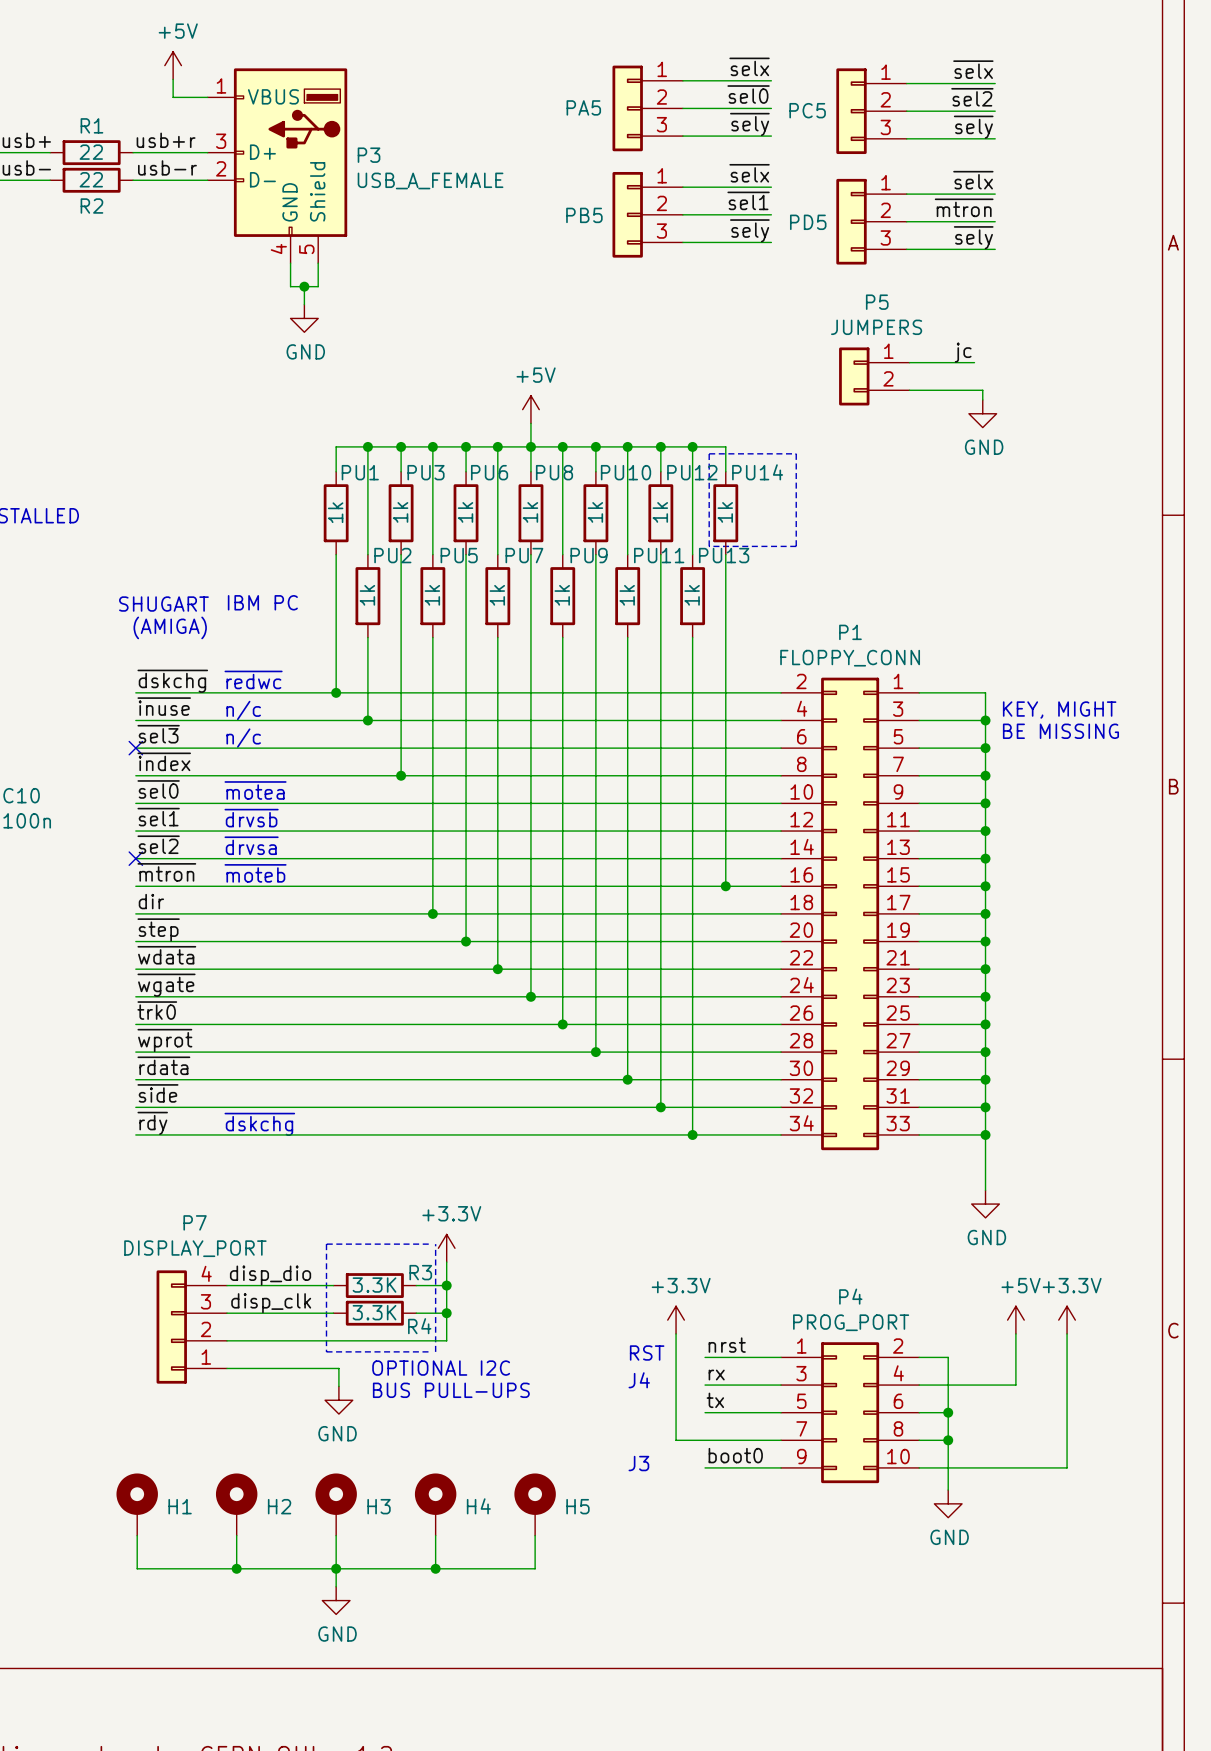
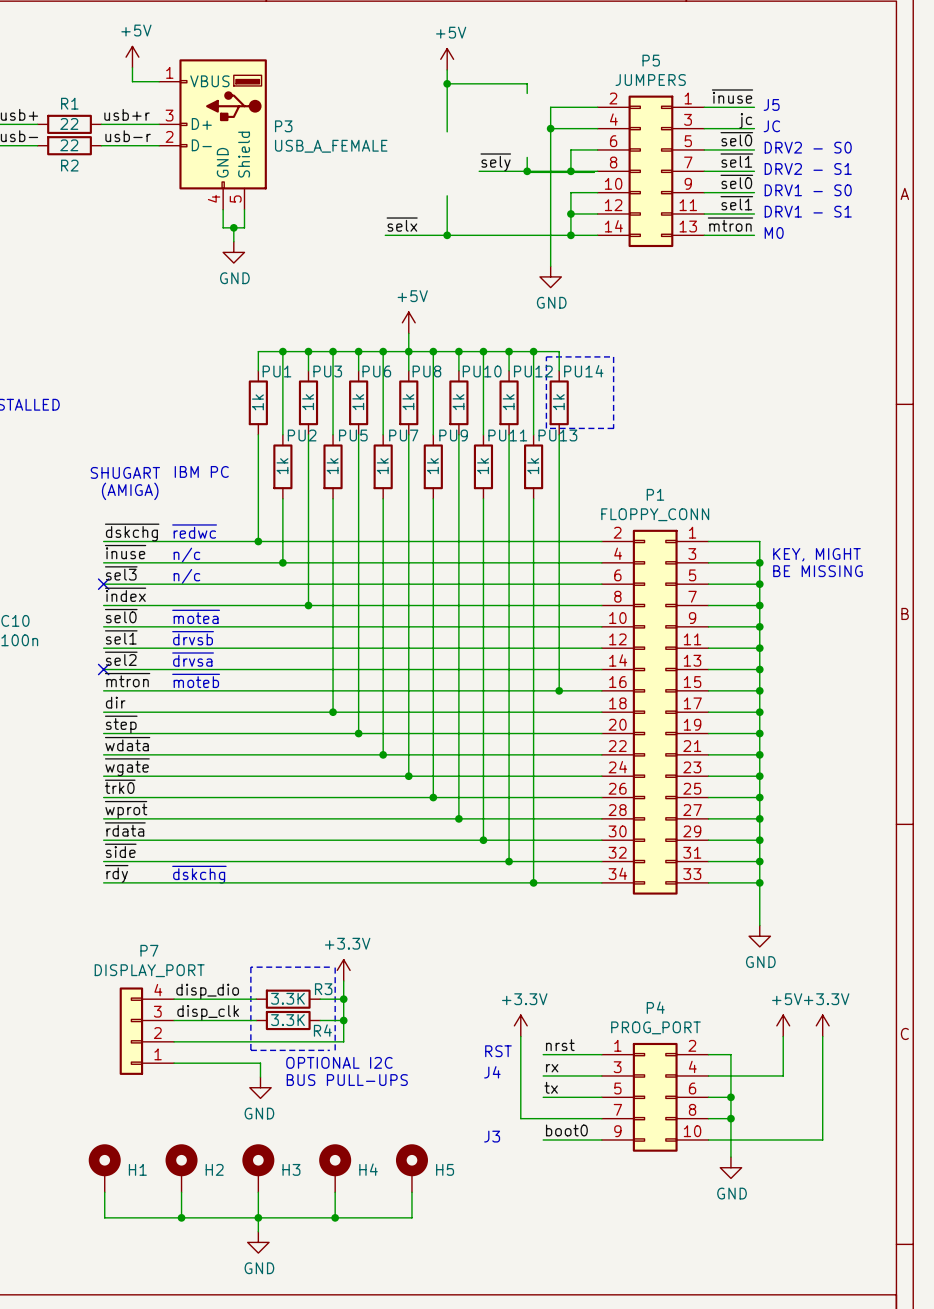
label: ~{selx} (749, 66) -> none
power symbol: none -> +5V (447, 59)
label: ~{selx} (973, 69) -> none
wire: (682, 80) (771, 80) -> none
wire: none -> (447, 69) (447, 131)
wire: (906, 83) (995, 83) -> none
label: ~{sel0} (748, 94) -> none
label: ~{sel2} (972, 97) -> none
wire: none -> (447, 83) (527, 83) (527, 93)
junction: none -> (447, 83)
PA5: (647, 108) -> none
wire: (682, 108) (771, 108) -> none
PC5: (871, 111) -> none
wire: (906, 111) (995, 111) -> none
label: none -> ~{inuse} (732, 96)
label: ~{sely} (749, 124) -> none
label: ~{sely} (973, 127) -> none
text: none -> J5 (771, 104)
wire: none -> (597, 107) (550, 107) (550, 266)
wire: none -> (704, 107) (754, 107)
wire: (682, 136) (771, 136) -> none
wire: (906, 138) (995, 138) -> none
text: none -> JC (771, 126)
wire: none -> (550, 128) (597, 128)
junction: none -> (550, 128)
wire: none -> (704, 128) (754, 128)
label: none -> ~{sel0} (736, 139)
label: ~{selx} (749, 173) -> none
label: ~{selx} (973, 180) -> none
text: none -> DRV2 - S0 (808, 147)
wire: none -> (597, 149) (570, 149) (570, 171)
wire: none -> (704, 149) (754, 149)
wire: (682, 187) (771, 187) -> none
wire: (906, 194) (995, 194) -> none
wire: none -> (527, 157) (527, 171)
label: none -> ~{sel1} (736, 160)
label: ~{sel1} (748, 200) -> none
label: none -> ~{sely} (495, 162)
label position: ~{mtron} (964, 207) -> ~{mtron} (730, 224)
text: none -> DRV2 - S1 (808, 168)
wire: none -> (479, 171) (597, 171)
junction: none -> (527, 171)
junction: none -> (570, 171)
wire: none -> (704, 171) (754, 171)
PB5: (647, 214) -> none
PD5: (871, 221) -> none
wire: (906, 221) (995, 221) -> none
label: none -> ~{sel0} (736, 181)
label: ~{sely} (749, 230) -> none
label: ~{sely} (973, 237) -> none
text: none -> DRV1 - S0 (808, 190)
wire: none -> (597, 192) (570, 192) (570, 235)
wire: none -> (704, 192) (754, 192)
wire: (682, 242) (771, 242) -> none
wire: none -> (447, 195) (447, 235)
wire: (906, 249) (995, 249) -> none
label: none -> ~{sel1} (736, 203)
text: none -> DRV1 - S1 (808, 211)
wire: none -> (570, 213) (597, 213)
junction: none -> (570, 213)
wire: none -> (704, 213) (754, 213)
label: none -> ~{selx} (402, 224)
text: none -> M0 (774, 232)
wire: none -> (385, 235) (597, 235)
junction: none -> (447, 235)
junction: none -> (570, 235)
P5 name position: P5 (877, 302) -> P5 (651, 60)
P5 value position: JUMPERS (876, 327) -> JUMPERS (650, 80)
P5 symbol: [839, 347, 910, 406] -> [597, 95, 705, 248]
power symbol: none -> GND (550, 276)
label position: jc (963, 352) -> jc (745, 120)
wire: (909, 362) (974, 362) -> (704, 235) (754, 235)
wire: (909, 390) (982, 390) (982, 399) -> none
power symbol: GND (982, 413) -> none

